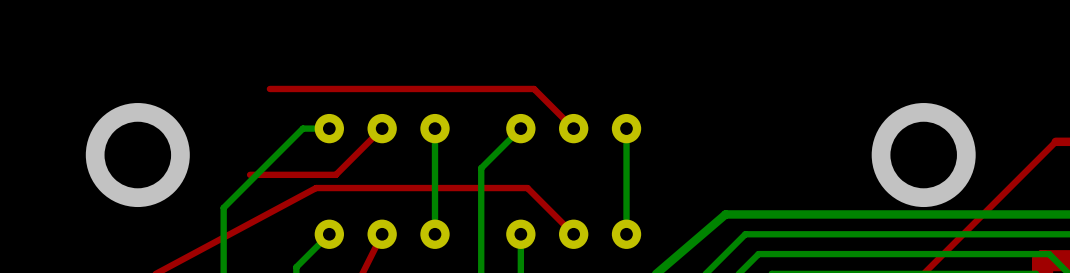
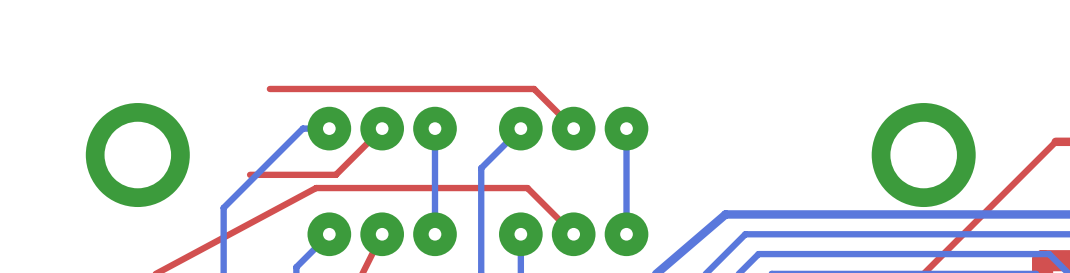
part footprint: [314, 113, 450, 144] -> [307, 106, 457, 151]
part footprint: [506, 113, 642, 144] -> [499, 106, 649, 151]
part footprint: [314, 219, 450, 249] -> [307, 212, 457, 257]
part footprint: [506, 219, 642, 249] -> [499, 212, 649, 257]

